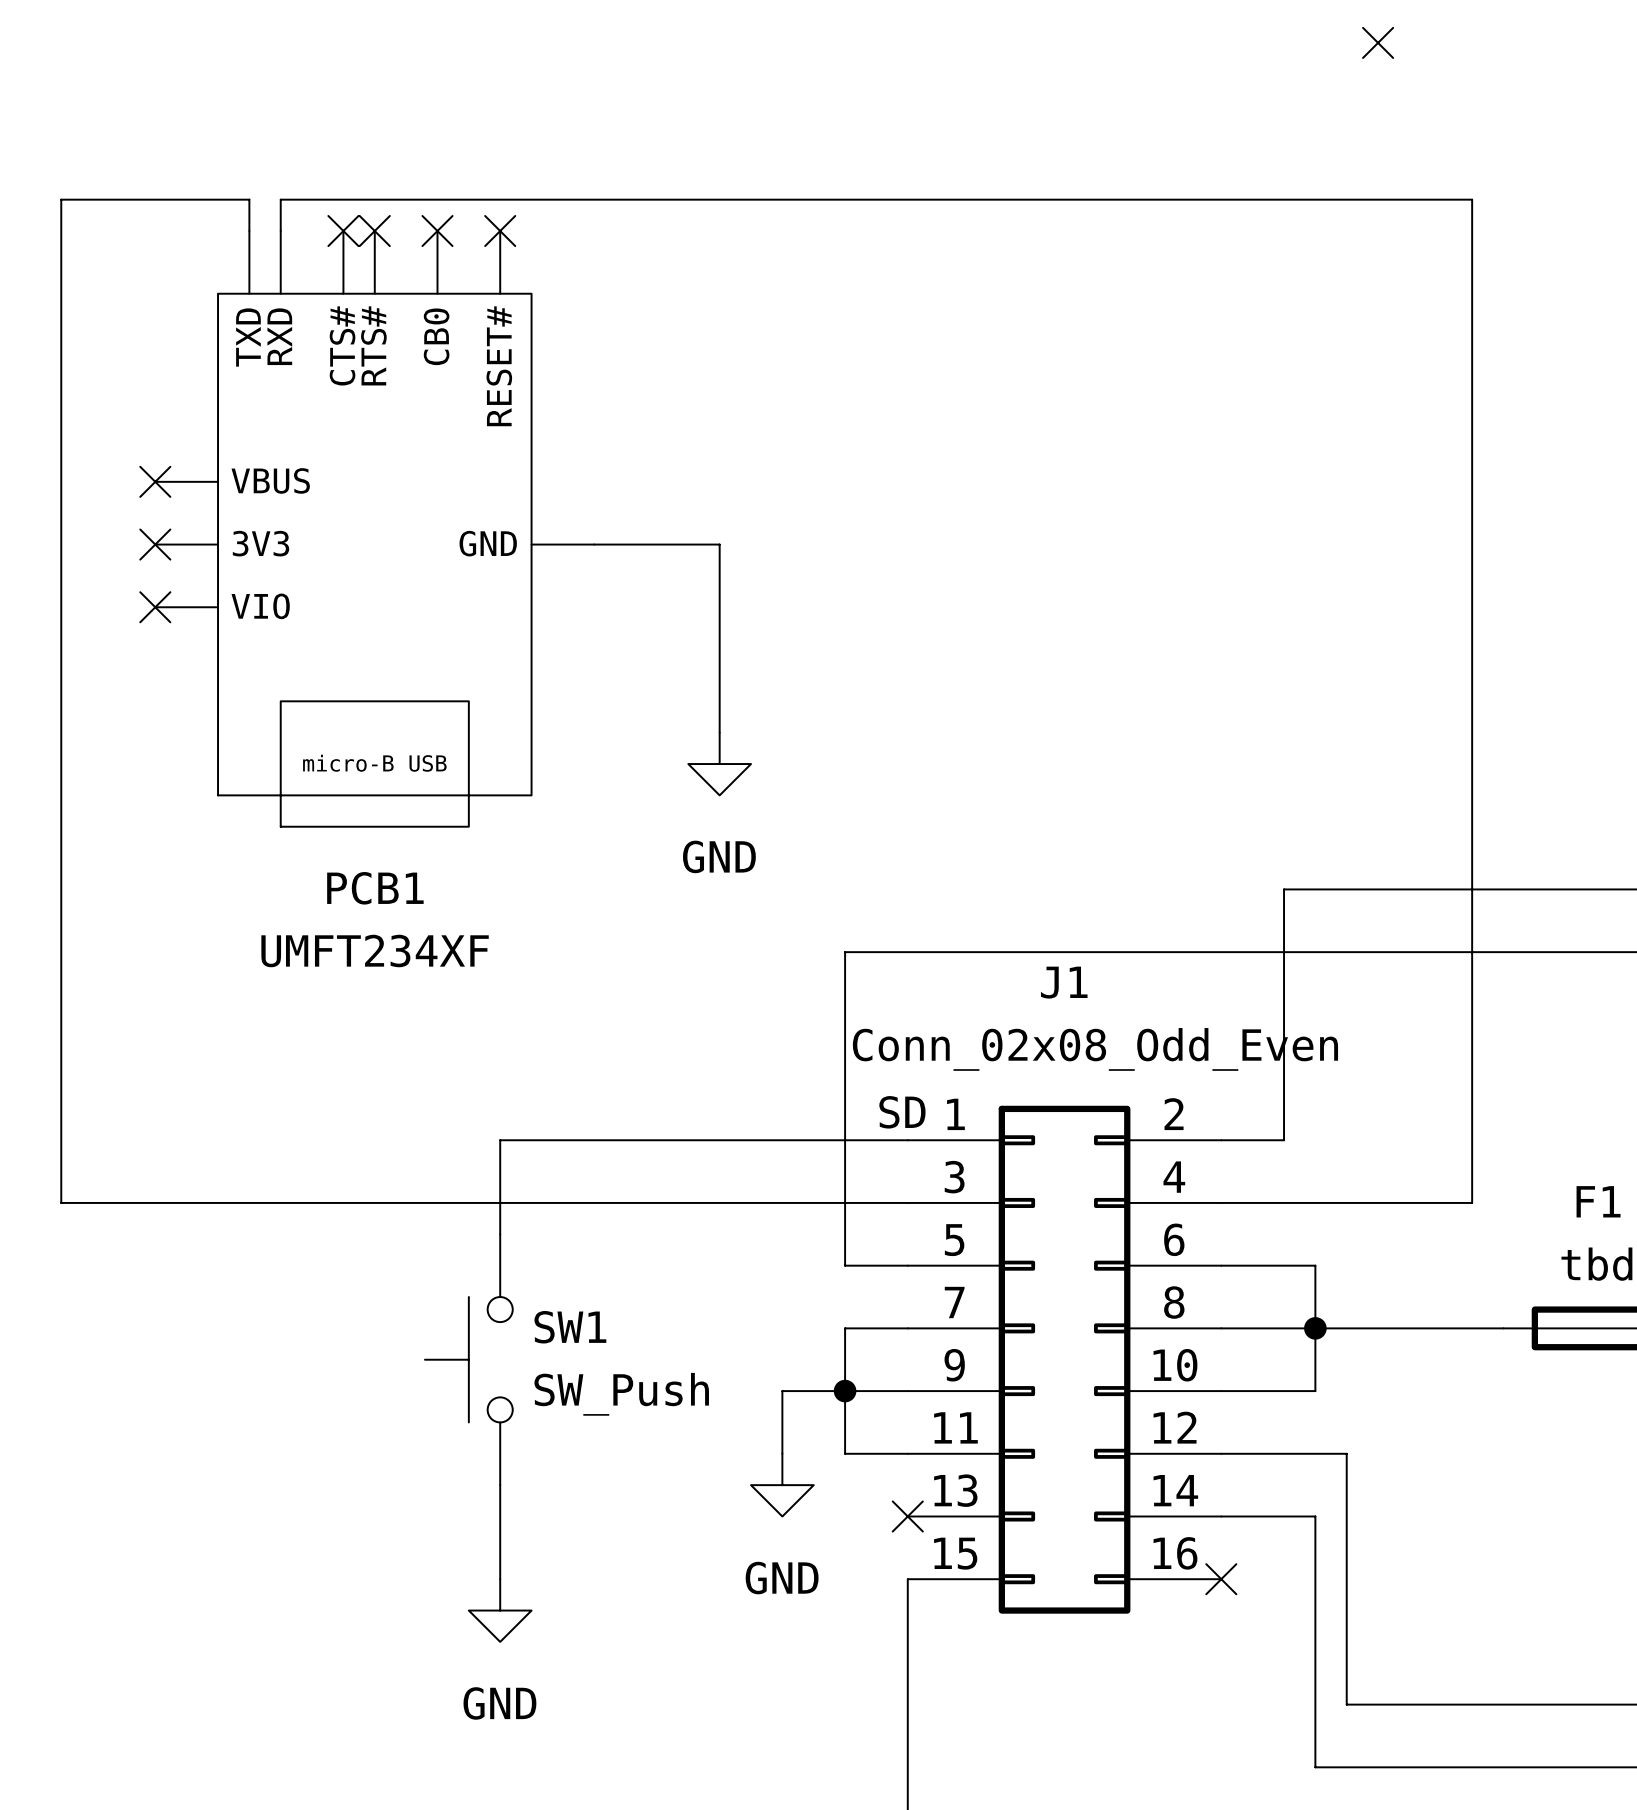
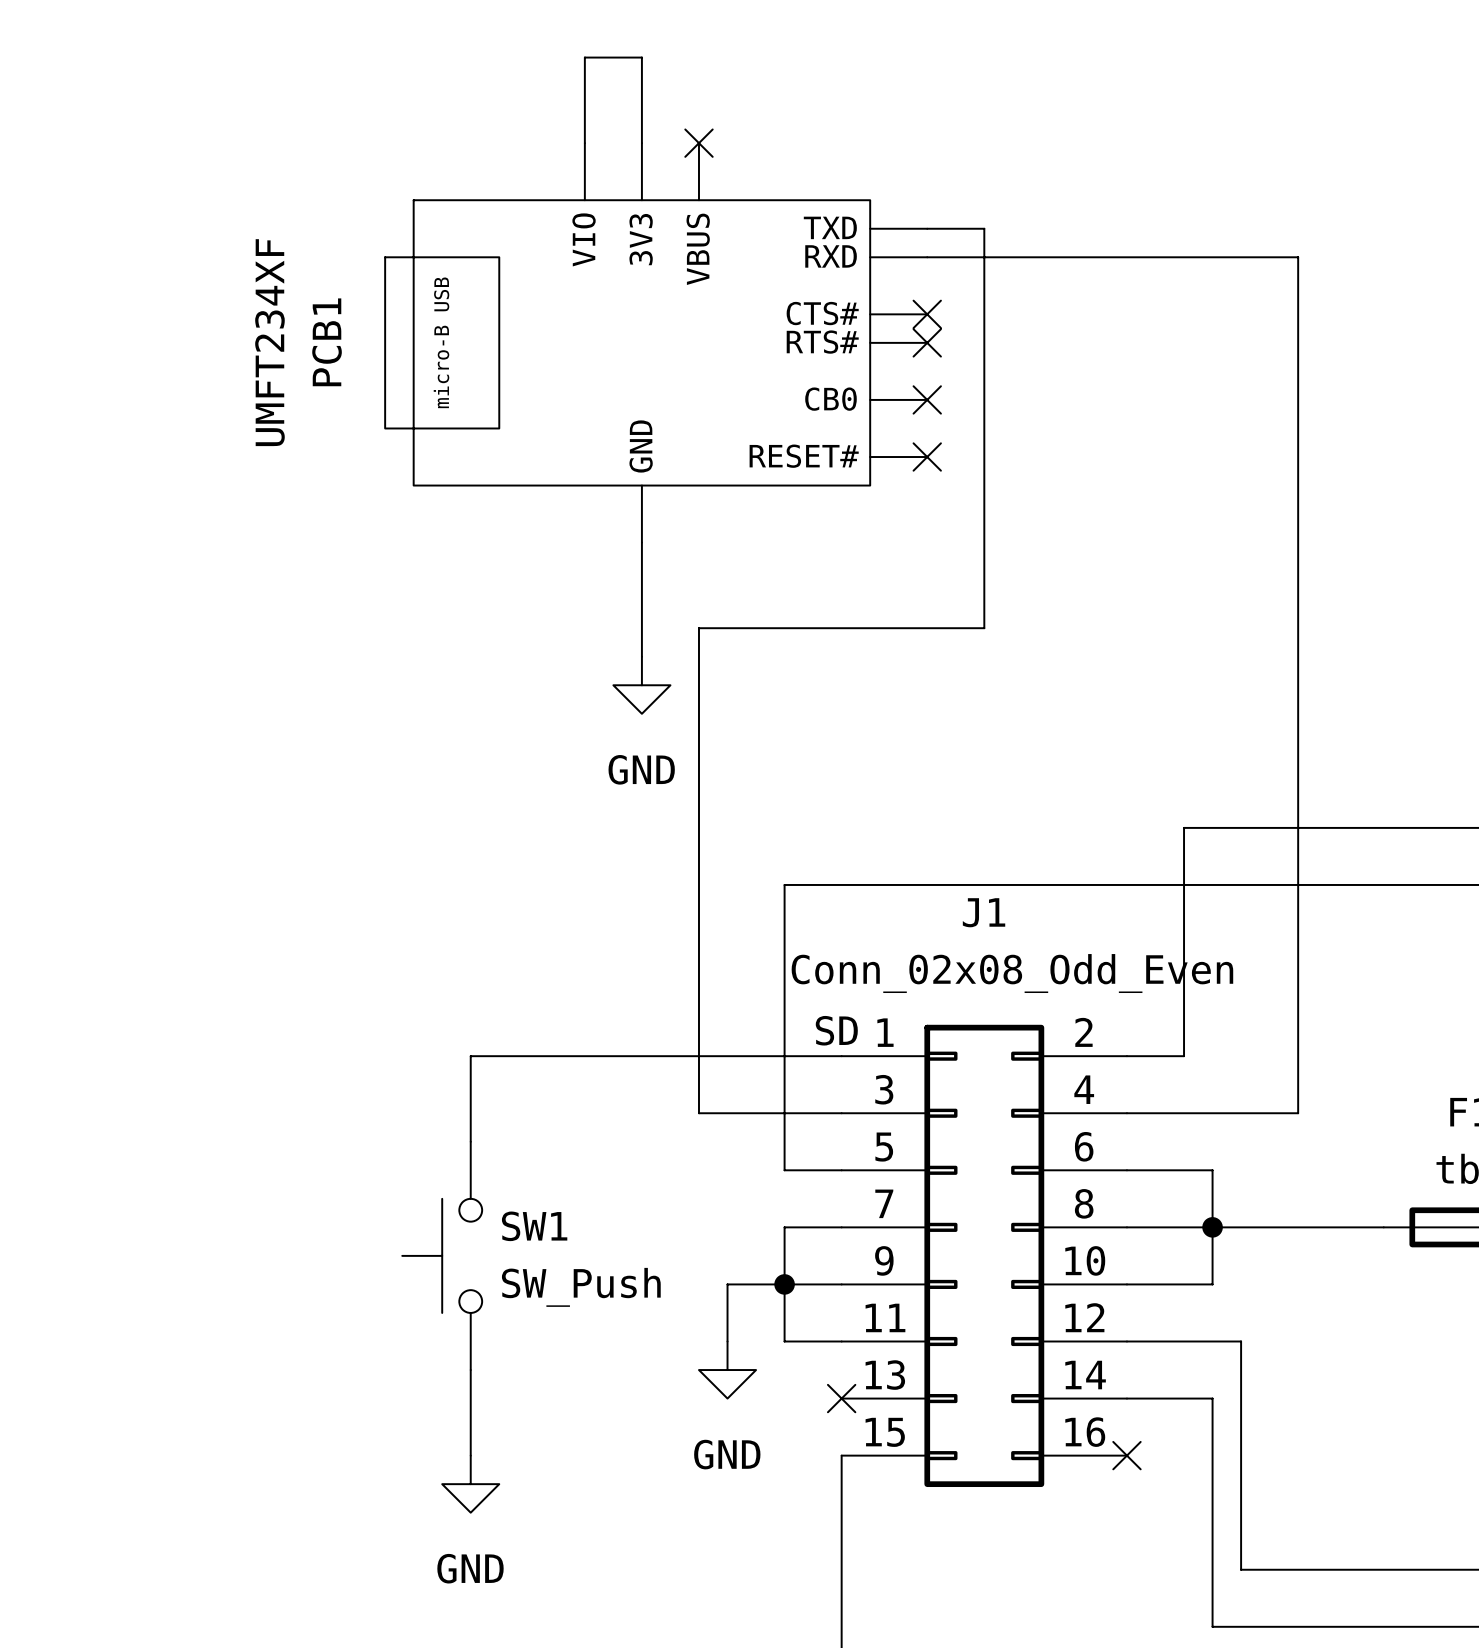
no-connect mark: (1378, 42) -> none
wire: none -> (584, 143) (584, 57) (641, 57) (641, 143)
no-connect mark: none -> (698, 143)
wire: (249, 231) (249, 199) (61, 199) (61, 1202) (751, 1202) -> (927, 228) (984, 228) (984, 628) (698, 628) (698, 1113)
wire: (280, 231) (280, 199) (1472, 199) (1472, 1202) (1409, 1202) -> (927, 257) (1298, 257) (1298, 1113)
no-connect mark: (343, 231) -> none
no-connect mark: (374, 231) -> none
no-connect mark: (437, 231) -> none
no-connect mark: (500, 231) -> none
no-connect mark: none -> (927, 314)
no-connect mark: none -> (927, 342)
no-connect mark: none -> (927, 399)
no-connect mark: (155, 481) -> none
no-connect mark: none -> (927, 457)
PCB1 position: (374, 528) -> (656, 342)
no-connect mark: (155, 544) -> none
wire: (594, 544) (719, 544) (719, 732) -> none
PCB1 rotation: 0° (374, 560) -> 90° clockwise (627, 342)
wire: none -> (641, 542) (641, 656)
no-connect mark: (155, 607) -> none
power symbol position: GND (719, 764) -> GND (641, 685)

